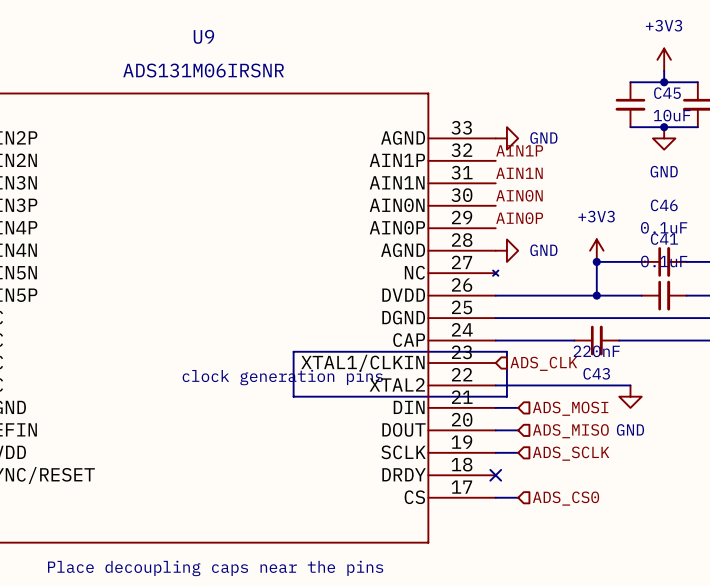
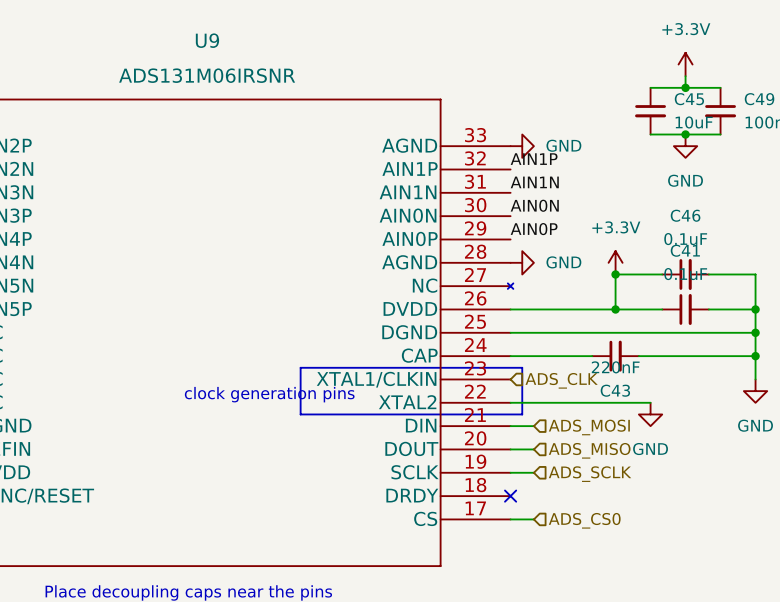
power symbol: +3V3 (664, 59) -> +3.3V (685, 64)
power symbol: +3V3 (596, 250) -> +3.3V (615, 262)

